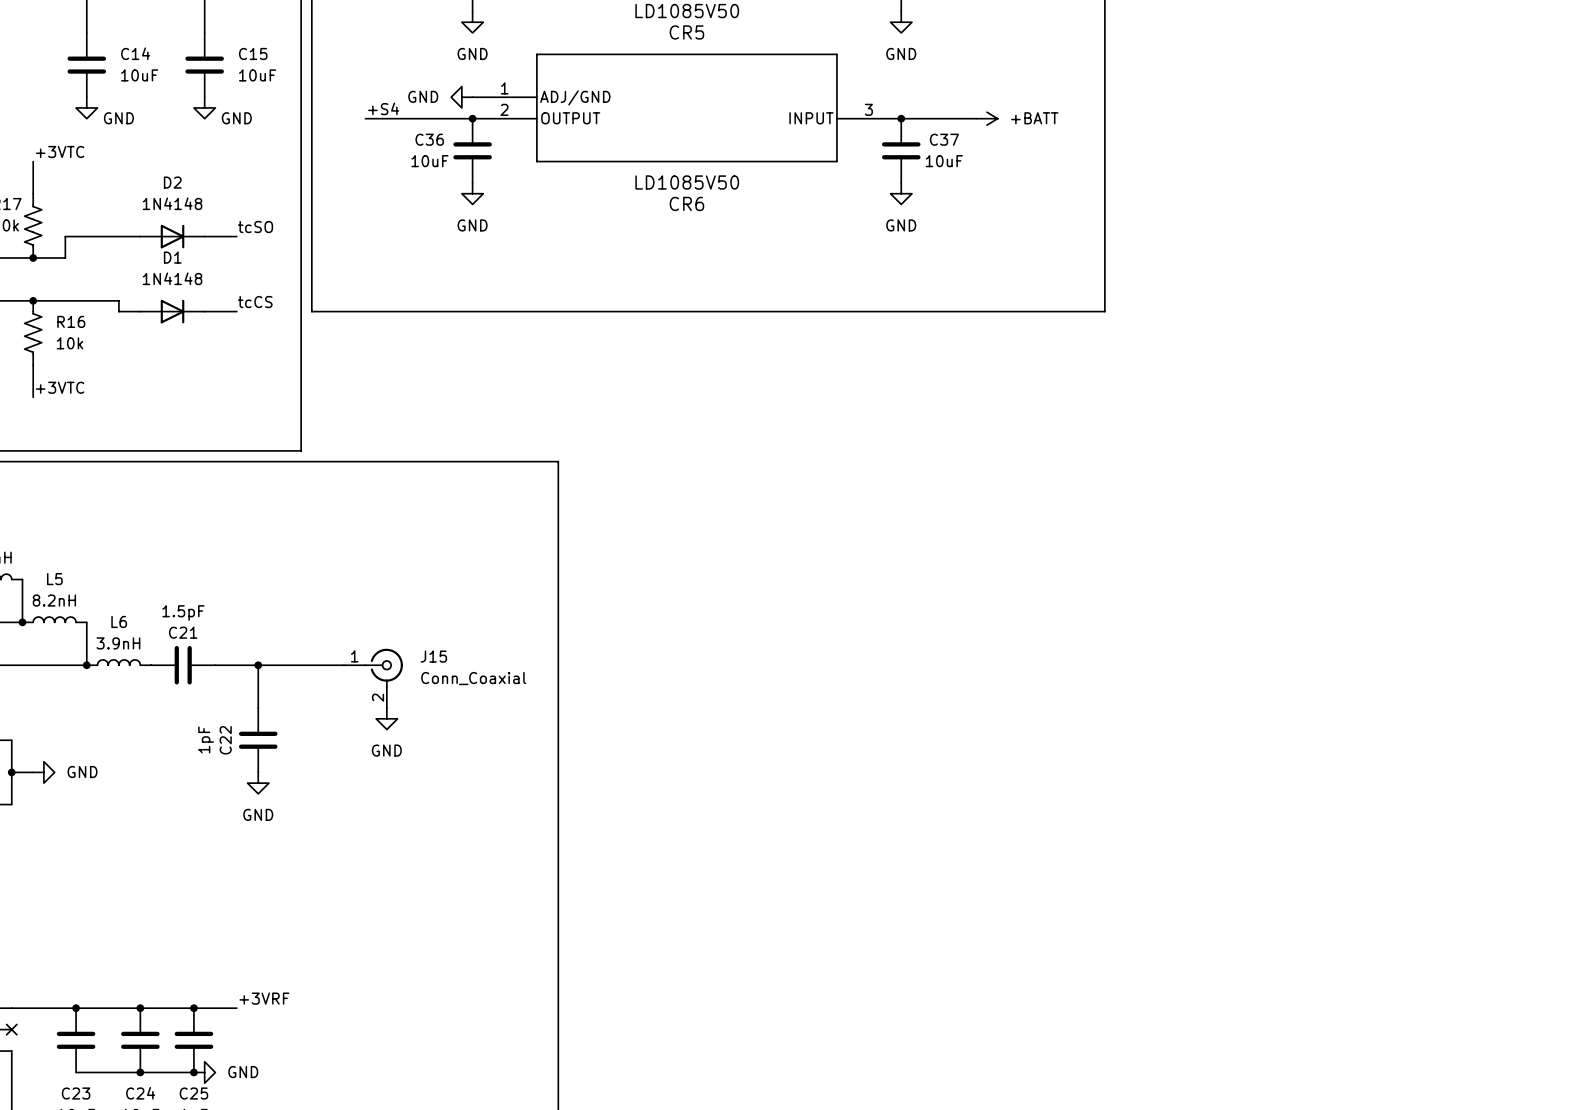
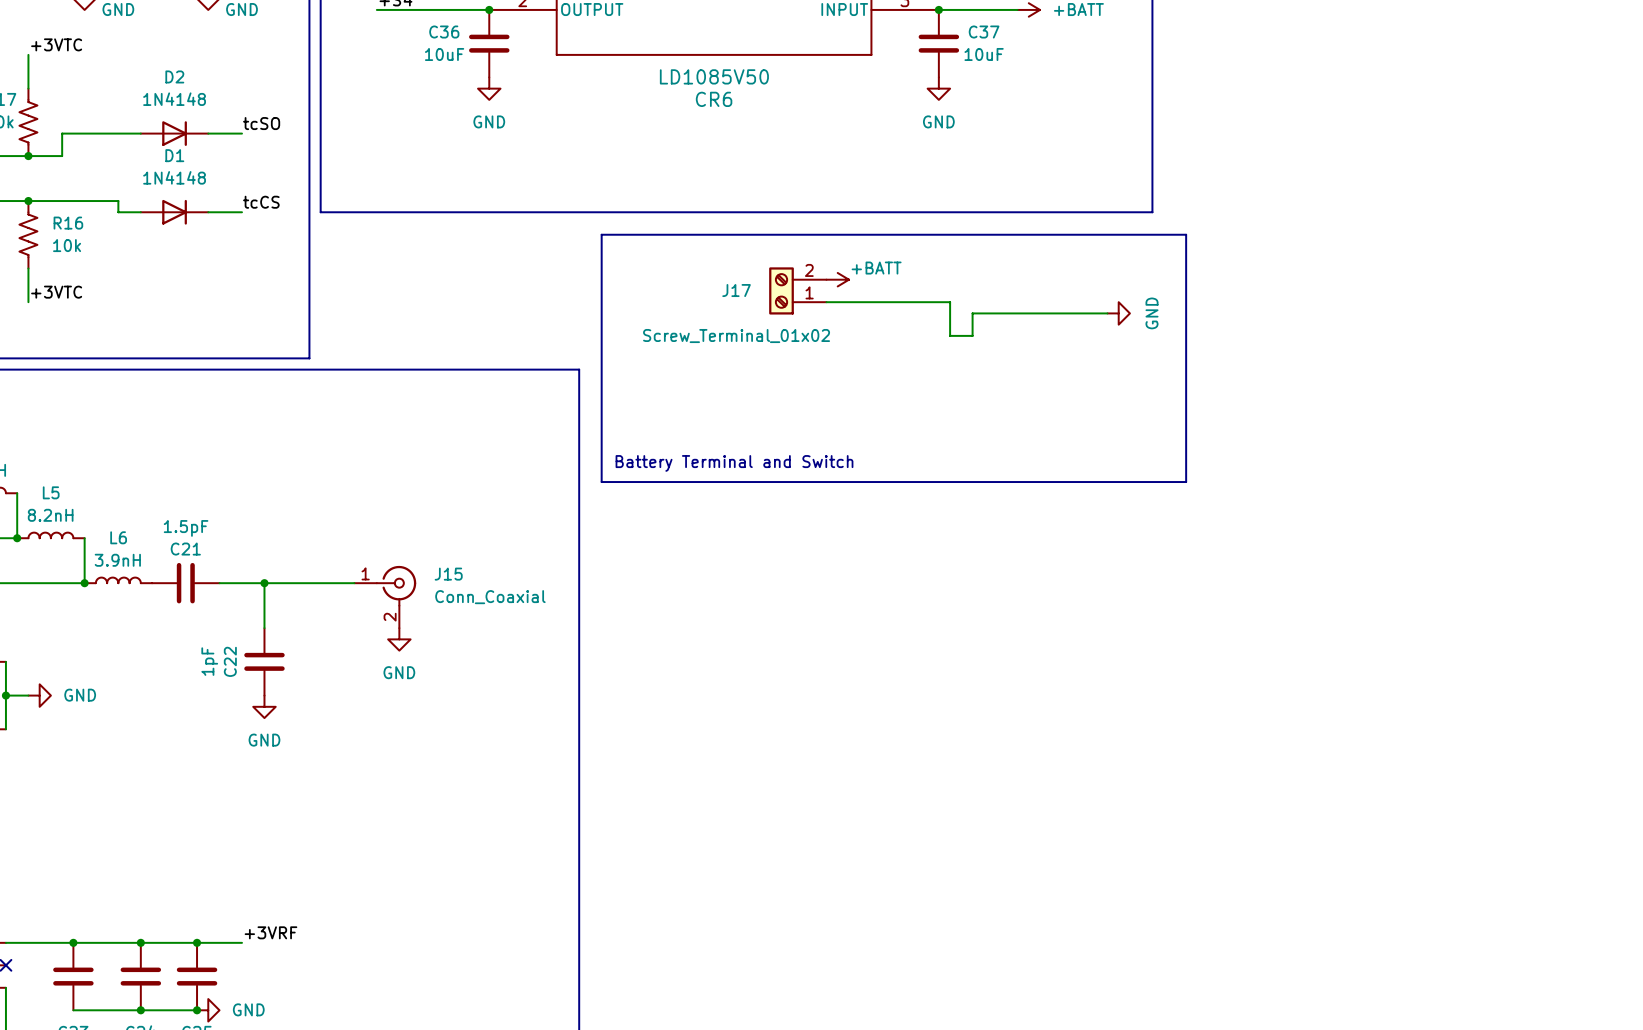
line: none -> (601, 234) (1186, 234) (1186, 482) (601, 482) (601, 234)
power symbol: none -> +BATT (837, 279)
J17: none -> Screw_Terminal_01x02 (797, 290)
wire: none -> (826, 302) (950, 302) (950, 335) (972, 335) (972, 313) (1107, 313)
power symbol: none -> GND (1118, 313)
text: none -> Battery Terminal and Switch (734, 463)

